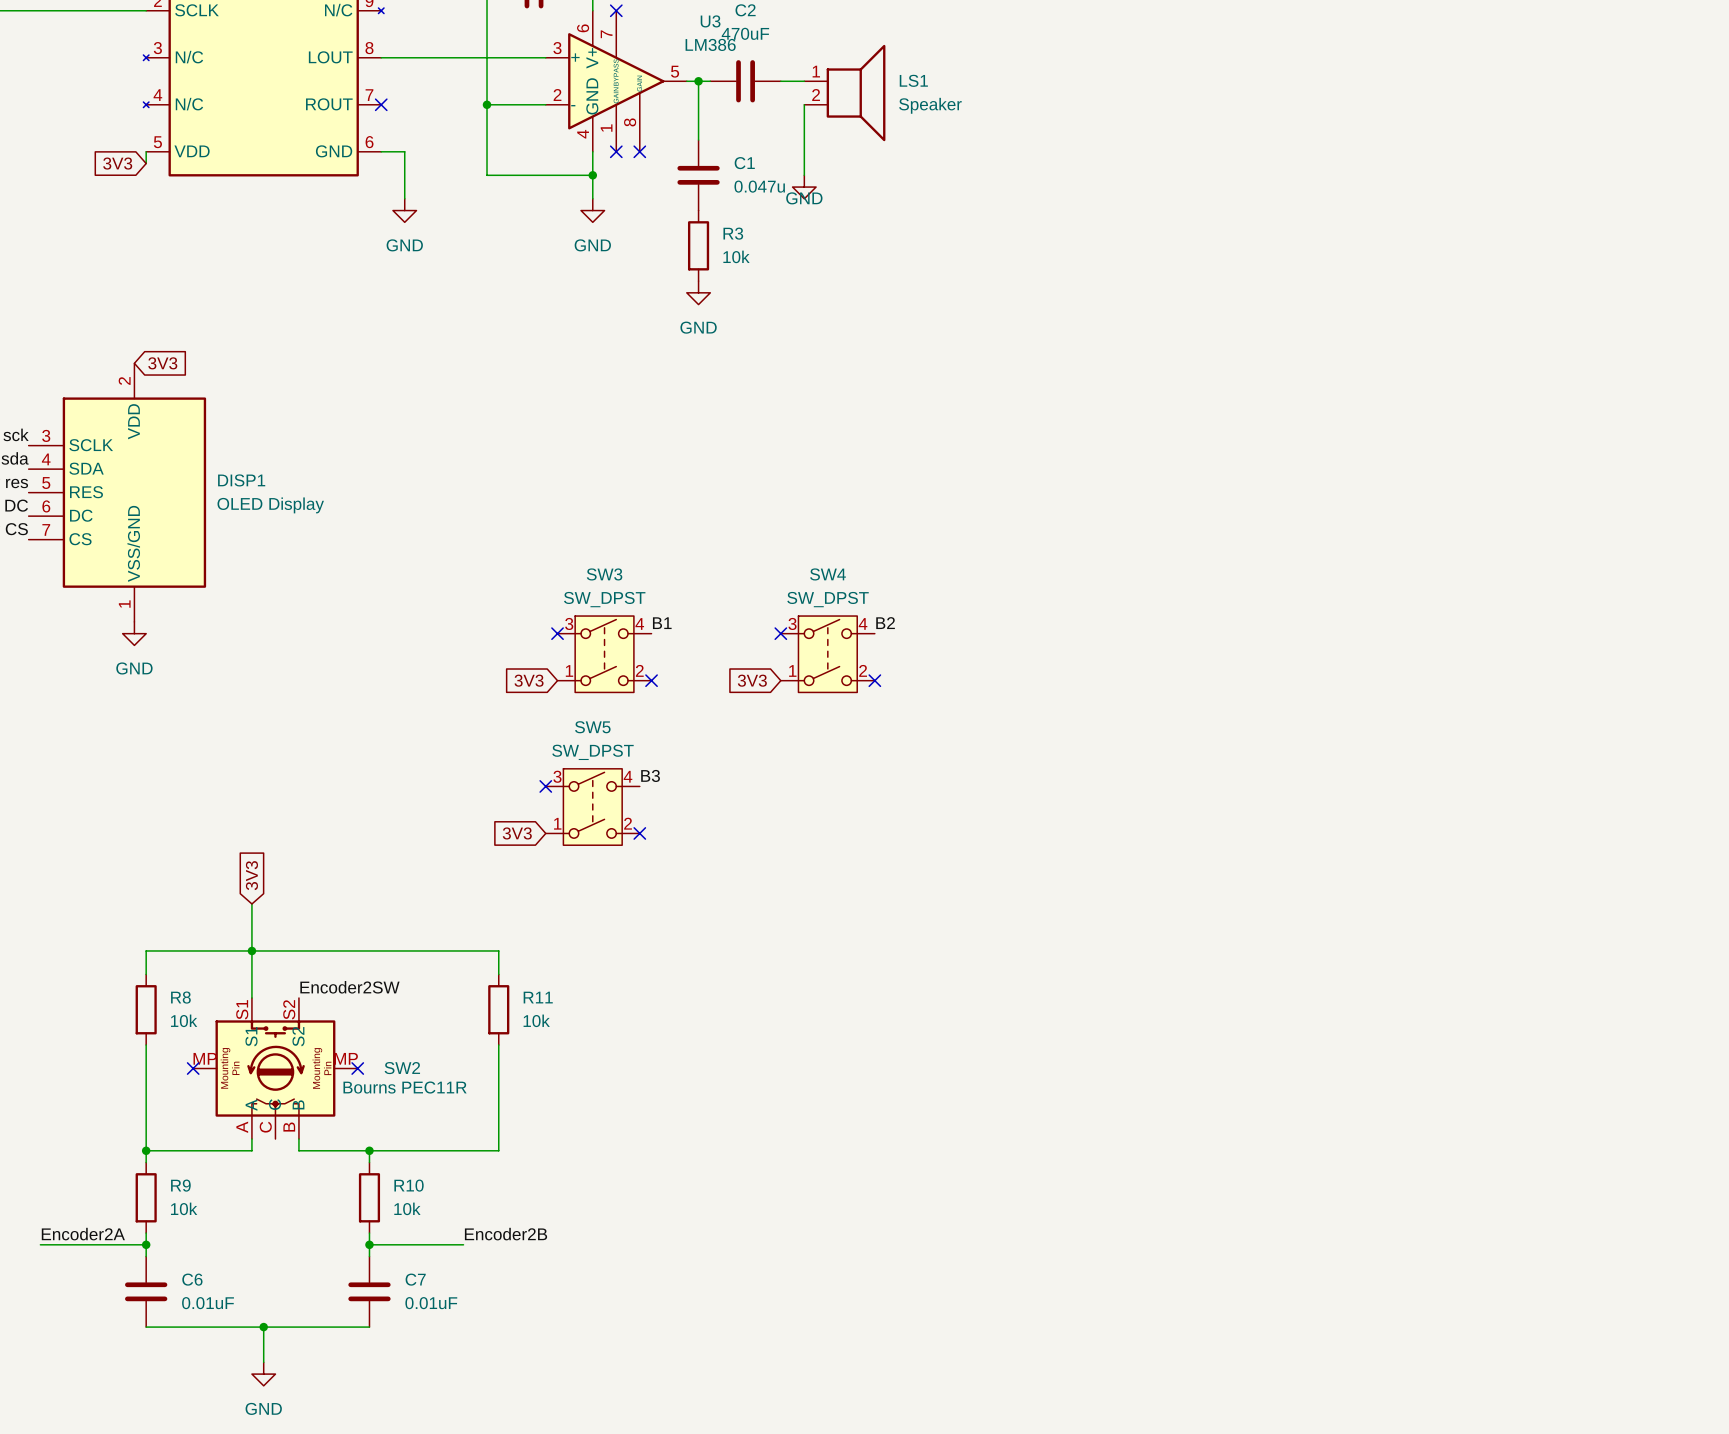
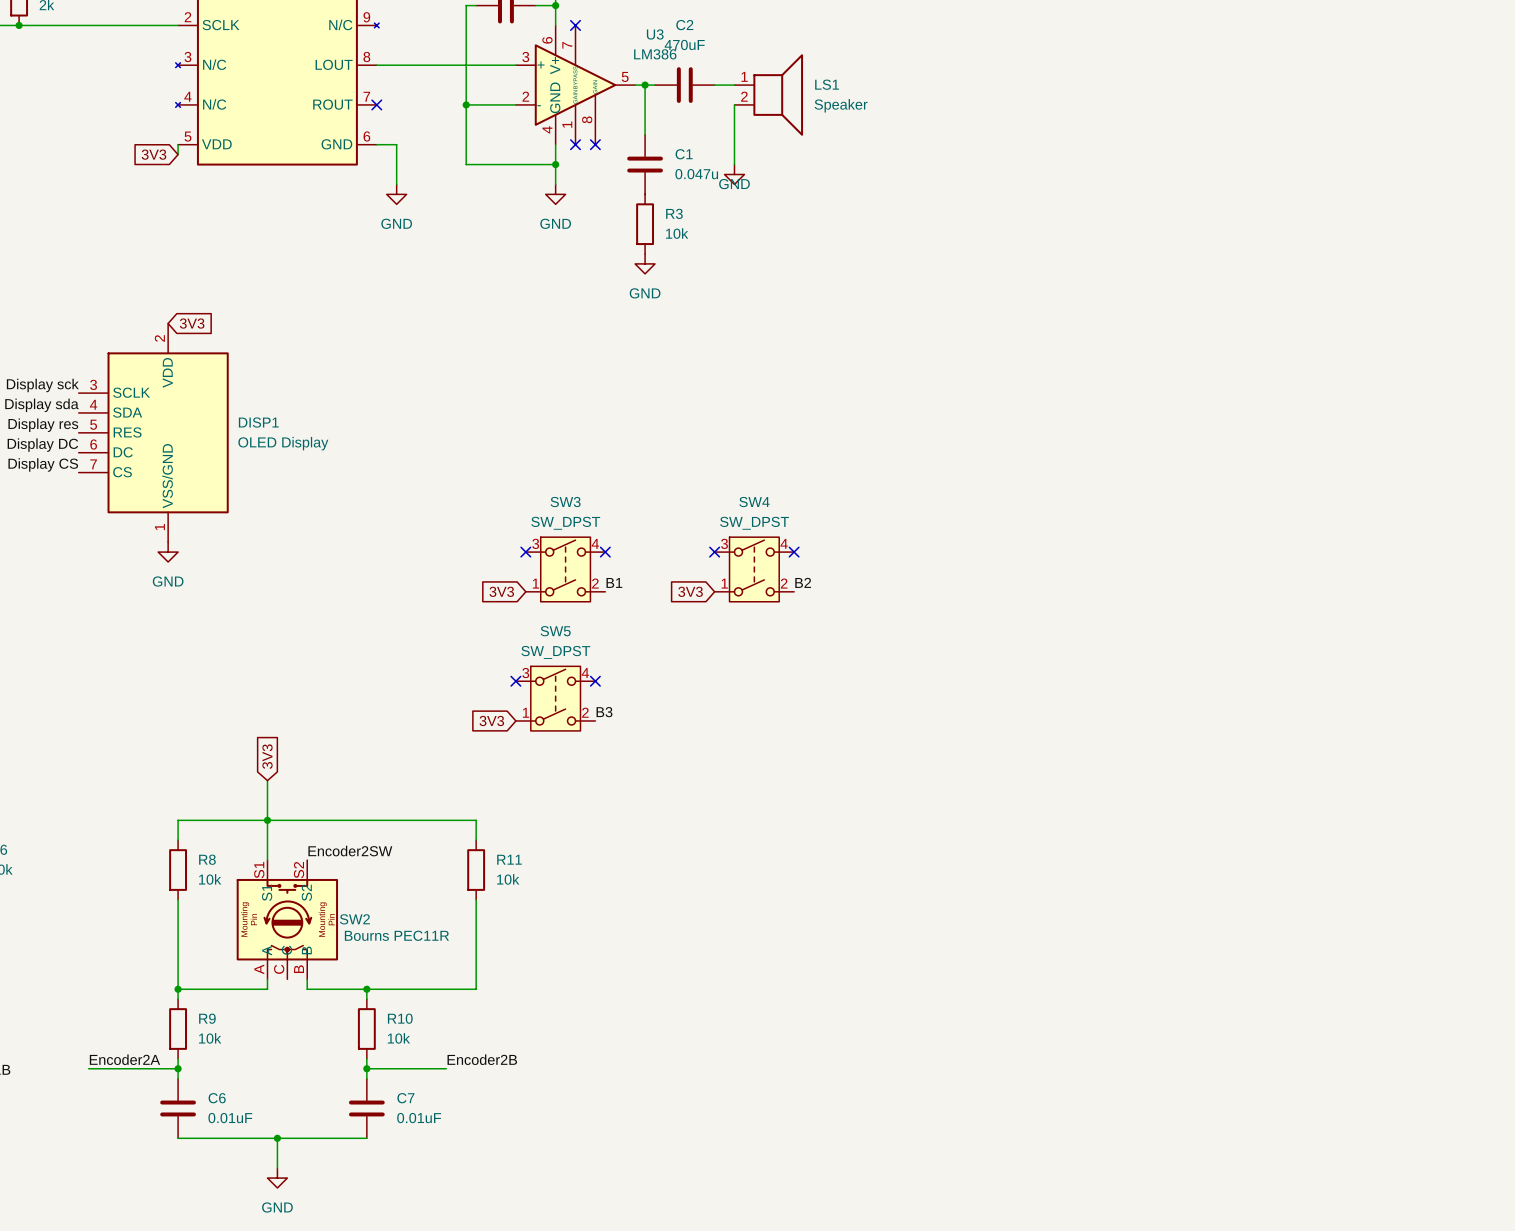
label position: B1 (662, 623) -> B1 (614, 582)
label position: B2 (885, 623) -> B2 (803, 582)
no-connect mark position: (651, 680) -> (605, 552)
no-connect mark position: (874, 680) -> (794, 552)
label position: B3 (650, 775) -> B3 (604, 712)
no-connect mark position: (639, 833) -> (595, 681)
SW2 symbol: [193, 998, 358, 1140] -> [236, 860, 339, 980]
no-connect mark: (193, 1068) -> none
no-connect mark: (357, 1068) -> none
SW2 name position: SW2 (402, 1068) -> SW2 (354, 919)

